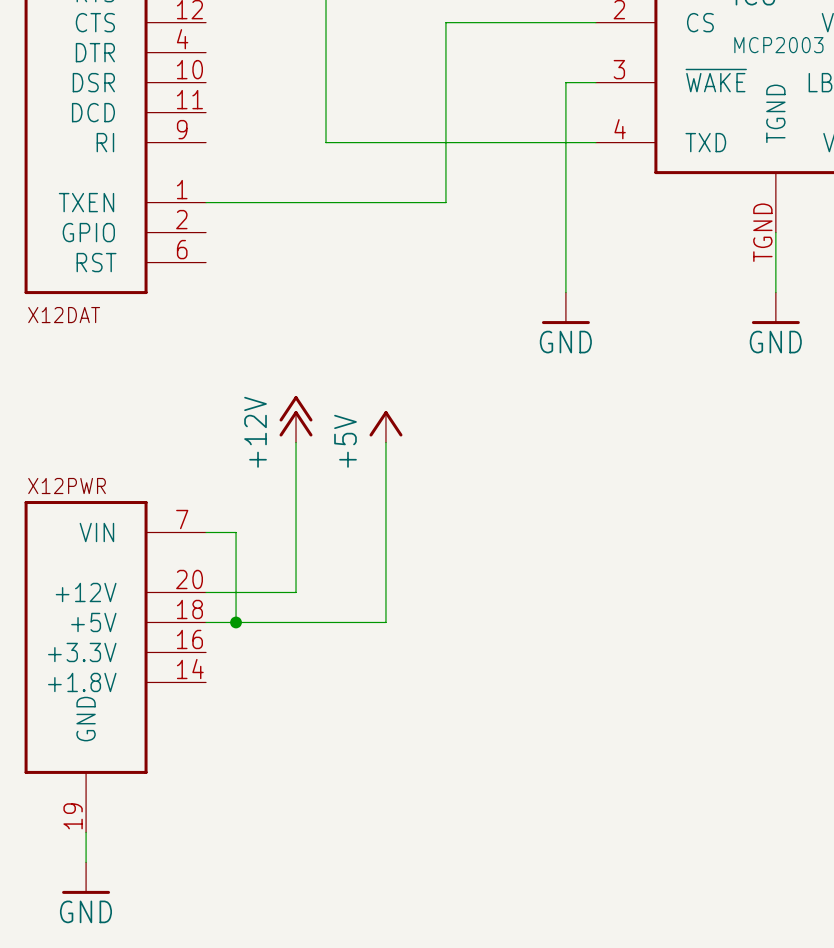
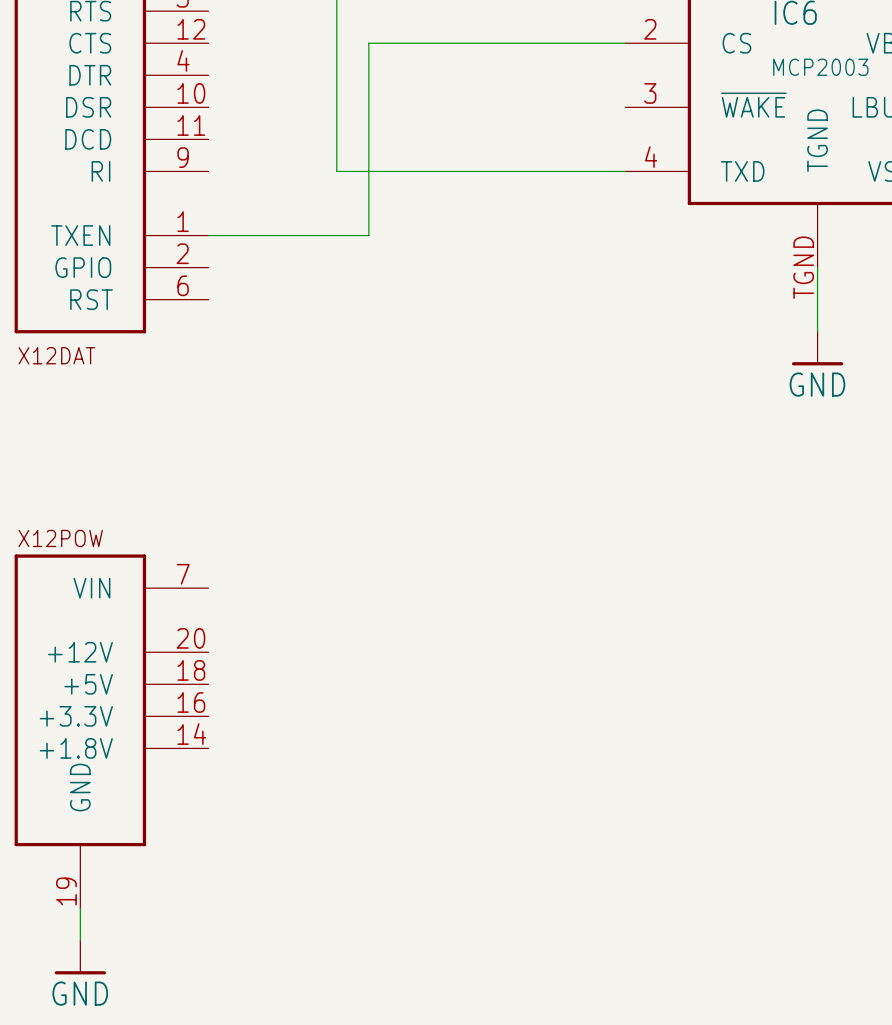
wire: (445, 22) (445, 202) (355, 202) -> (464, 43) (368, 43) (368, 235)
wire: (595, 82) (565, 82) (565, 292) -> none
power symbol: GND (565, 308) -> none
power symbol: +12V (296, 419) -> none
power symbol: +5V (385, 426) -> none
wire: (296, 442) (296, 592) (206, 592) -> none
wire: (385, 442) (385, 622) (206, 622) -> none
X12PWR name: X12PWR (67, 486) -> X12POW (60, 538)
wire: (206, 532) (236, 532) (236, 622) -> none
junction: (236, 622) -> none

